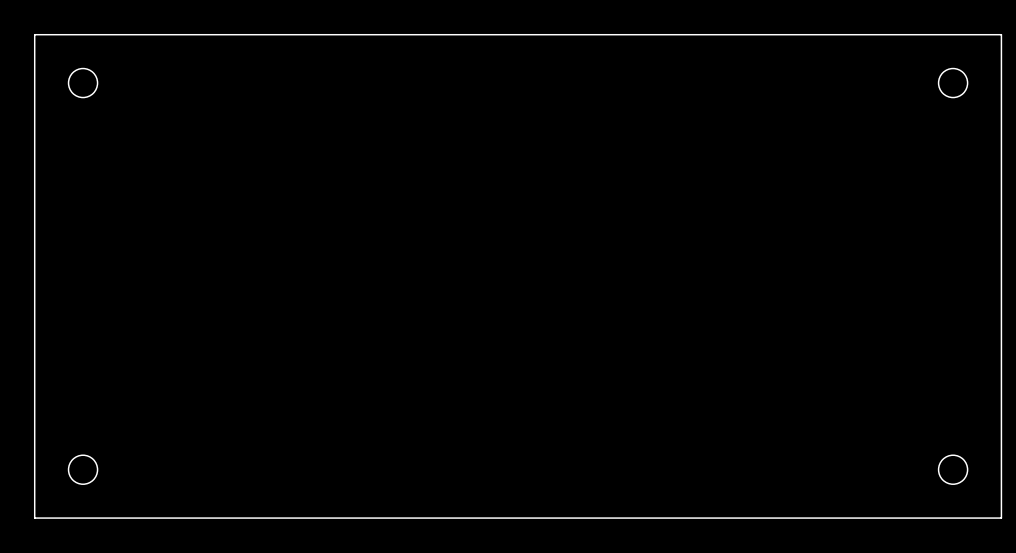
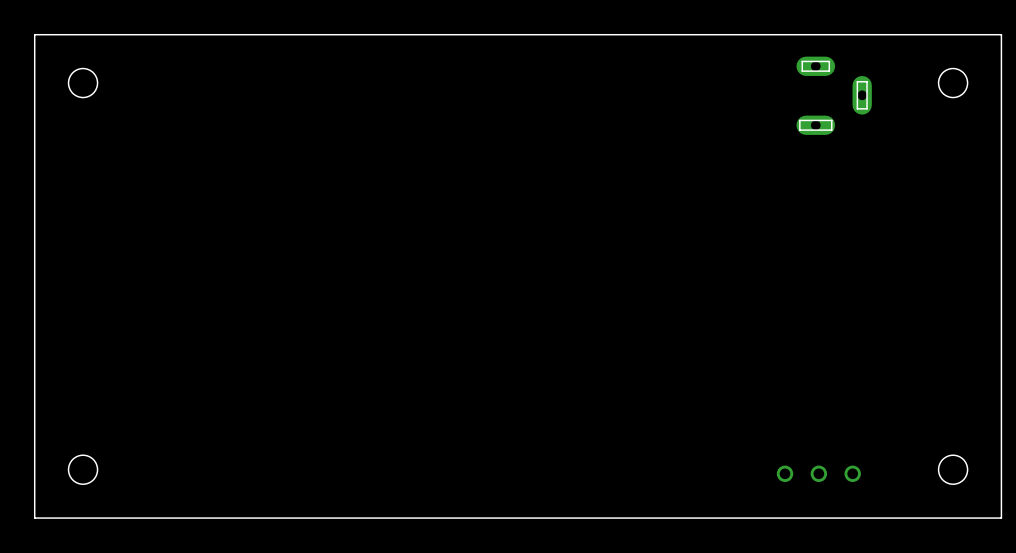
part: none -> (834, 95)
part: none -> (818, 473)

